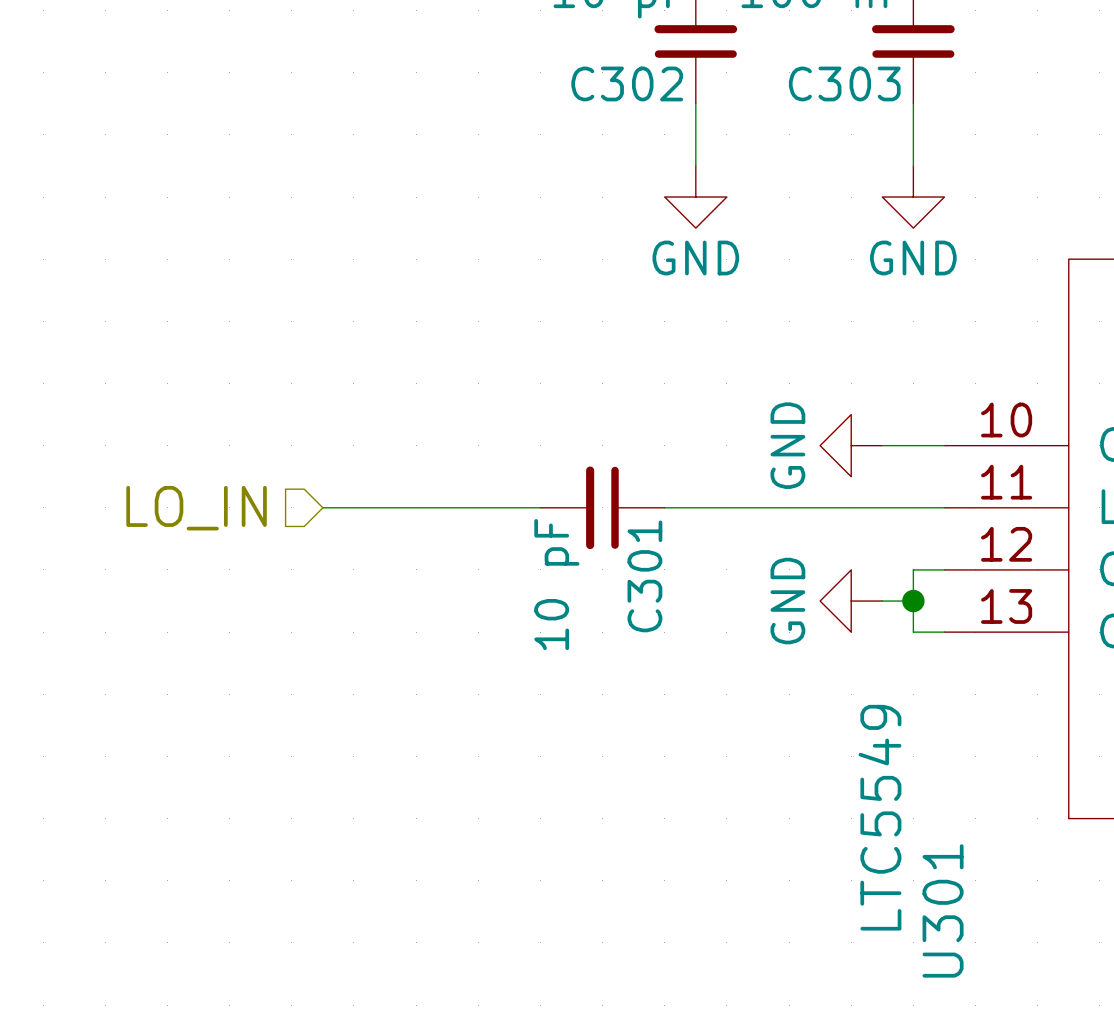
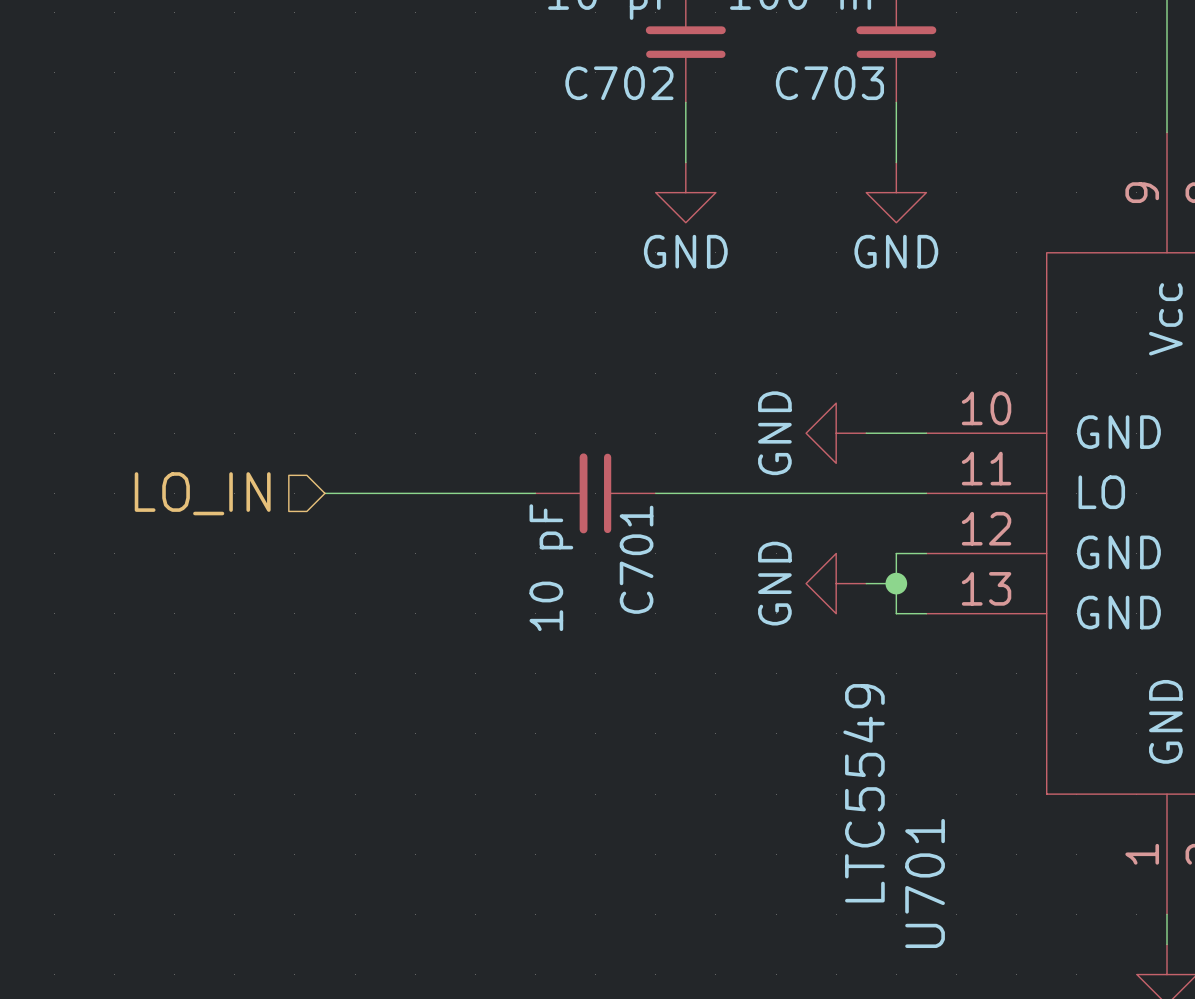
C302 name: C302 (627, 83) -> C702 (619, 83)
C303 name: C303 (844, 83) -> C703 (829, 83)
C301 name: C301 (644, 576) -> C701 (636, 559)
U301 name: U301 (943, 910) -> U701 (925, 883)

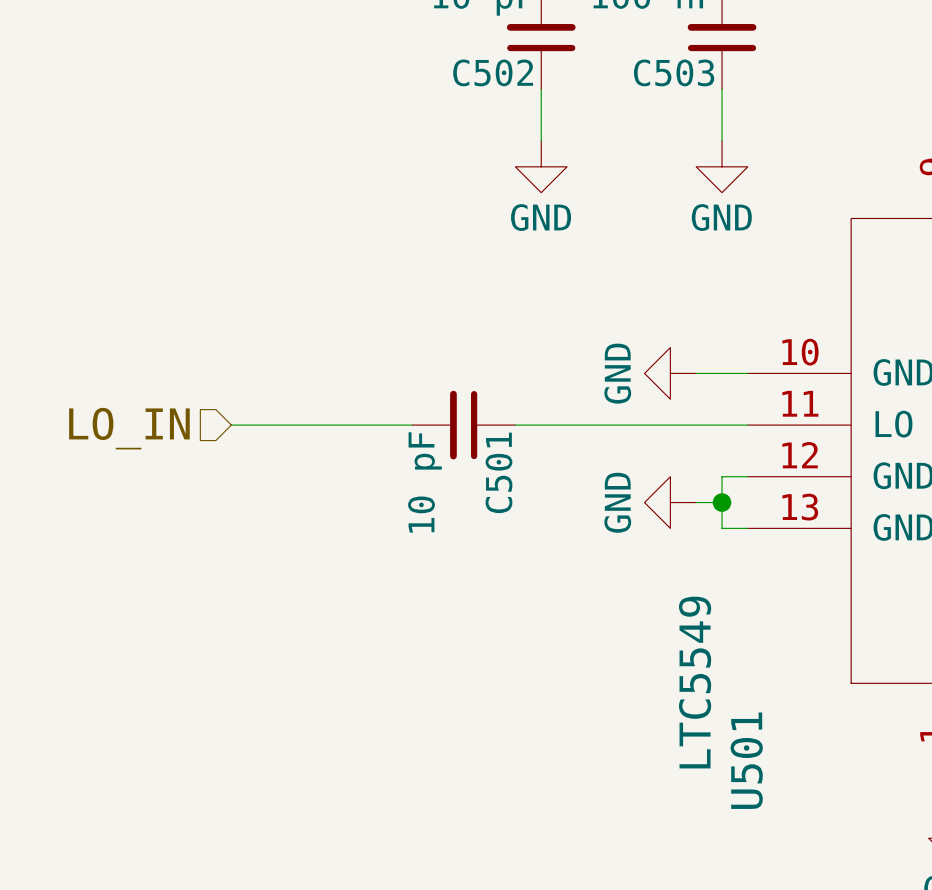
C702 name: C702 (619, 83) -> C502 (493, 72)
C703 name: C703 (829, 83) -> C503 (674, 72)
C701 name: C701 (636, 559) -> C501 (498, 472)
U701 name: U701 (925, 883) -> U501 (746, 760)

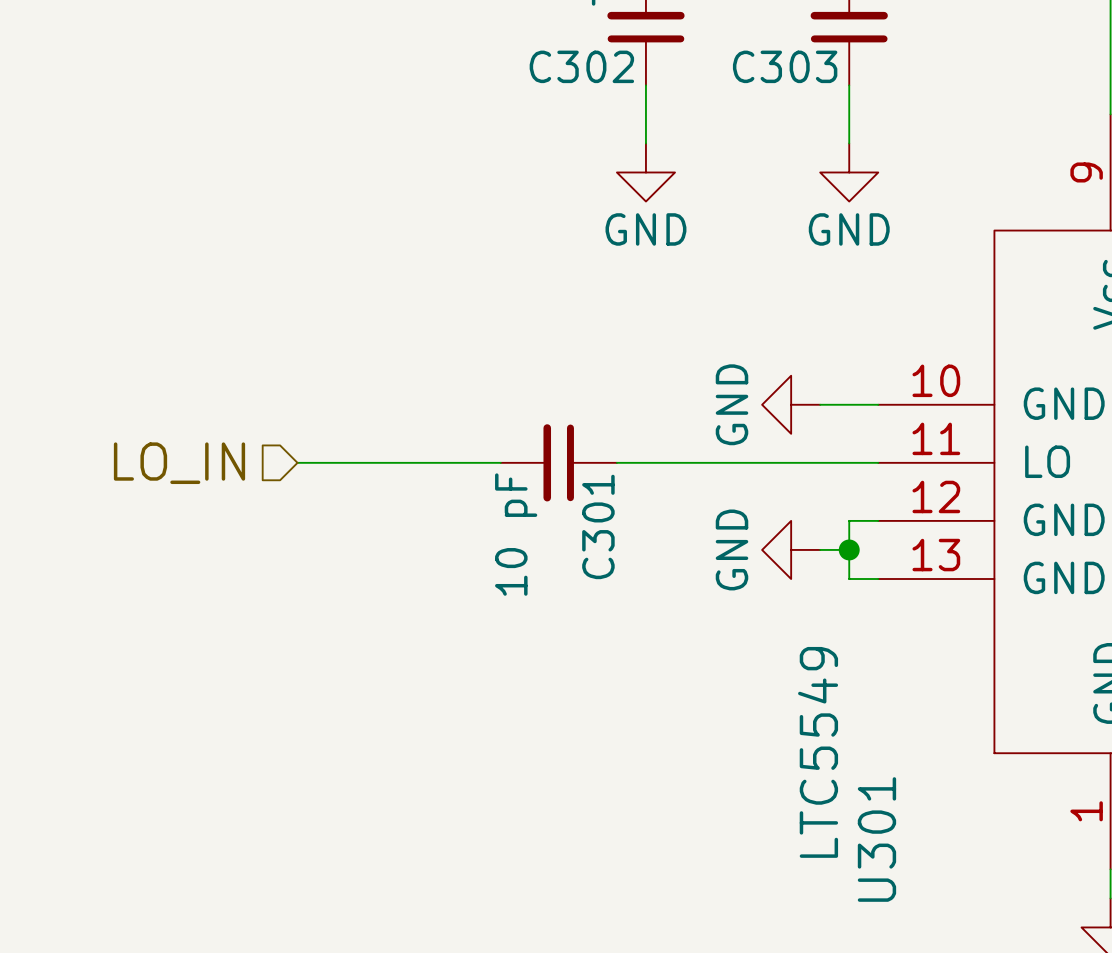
C502 name: C502 (493, 72) -> C302 (581, 66)
C503 name: C503 (674, 72) -> C303 (785, 66)
C501 name: C501 (498, 472) -> C301 (598, 526)
U501 name: U501 (746, 760) -> U301 (876, 839)

